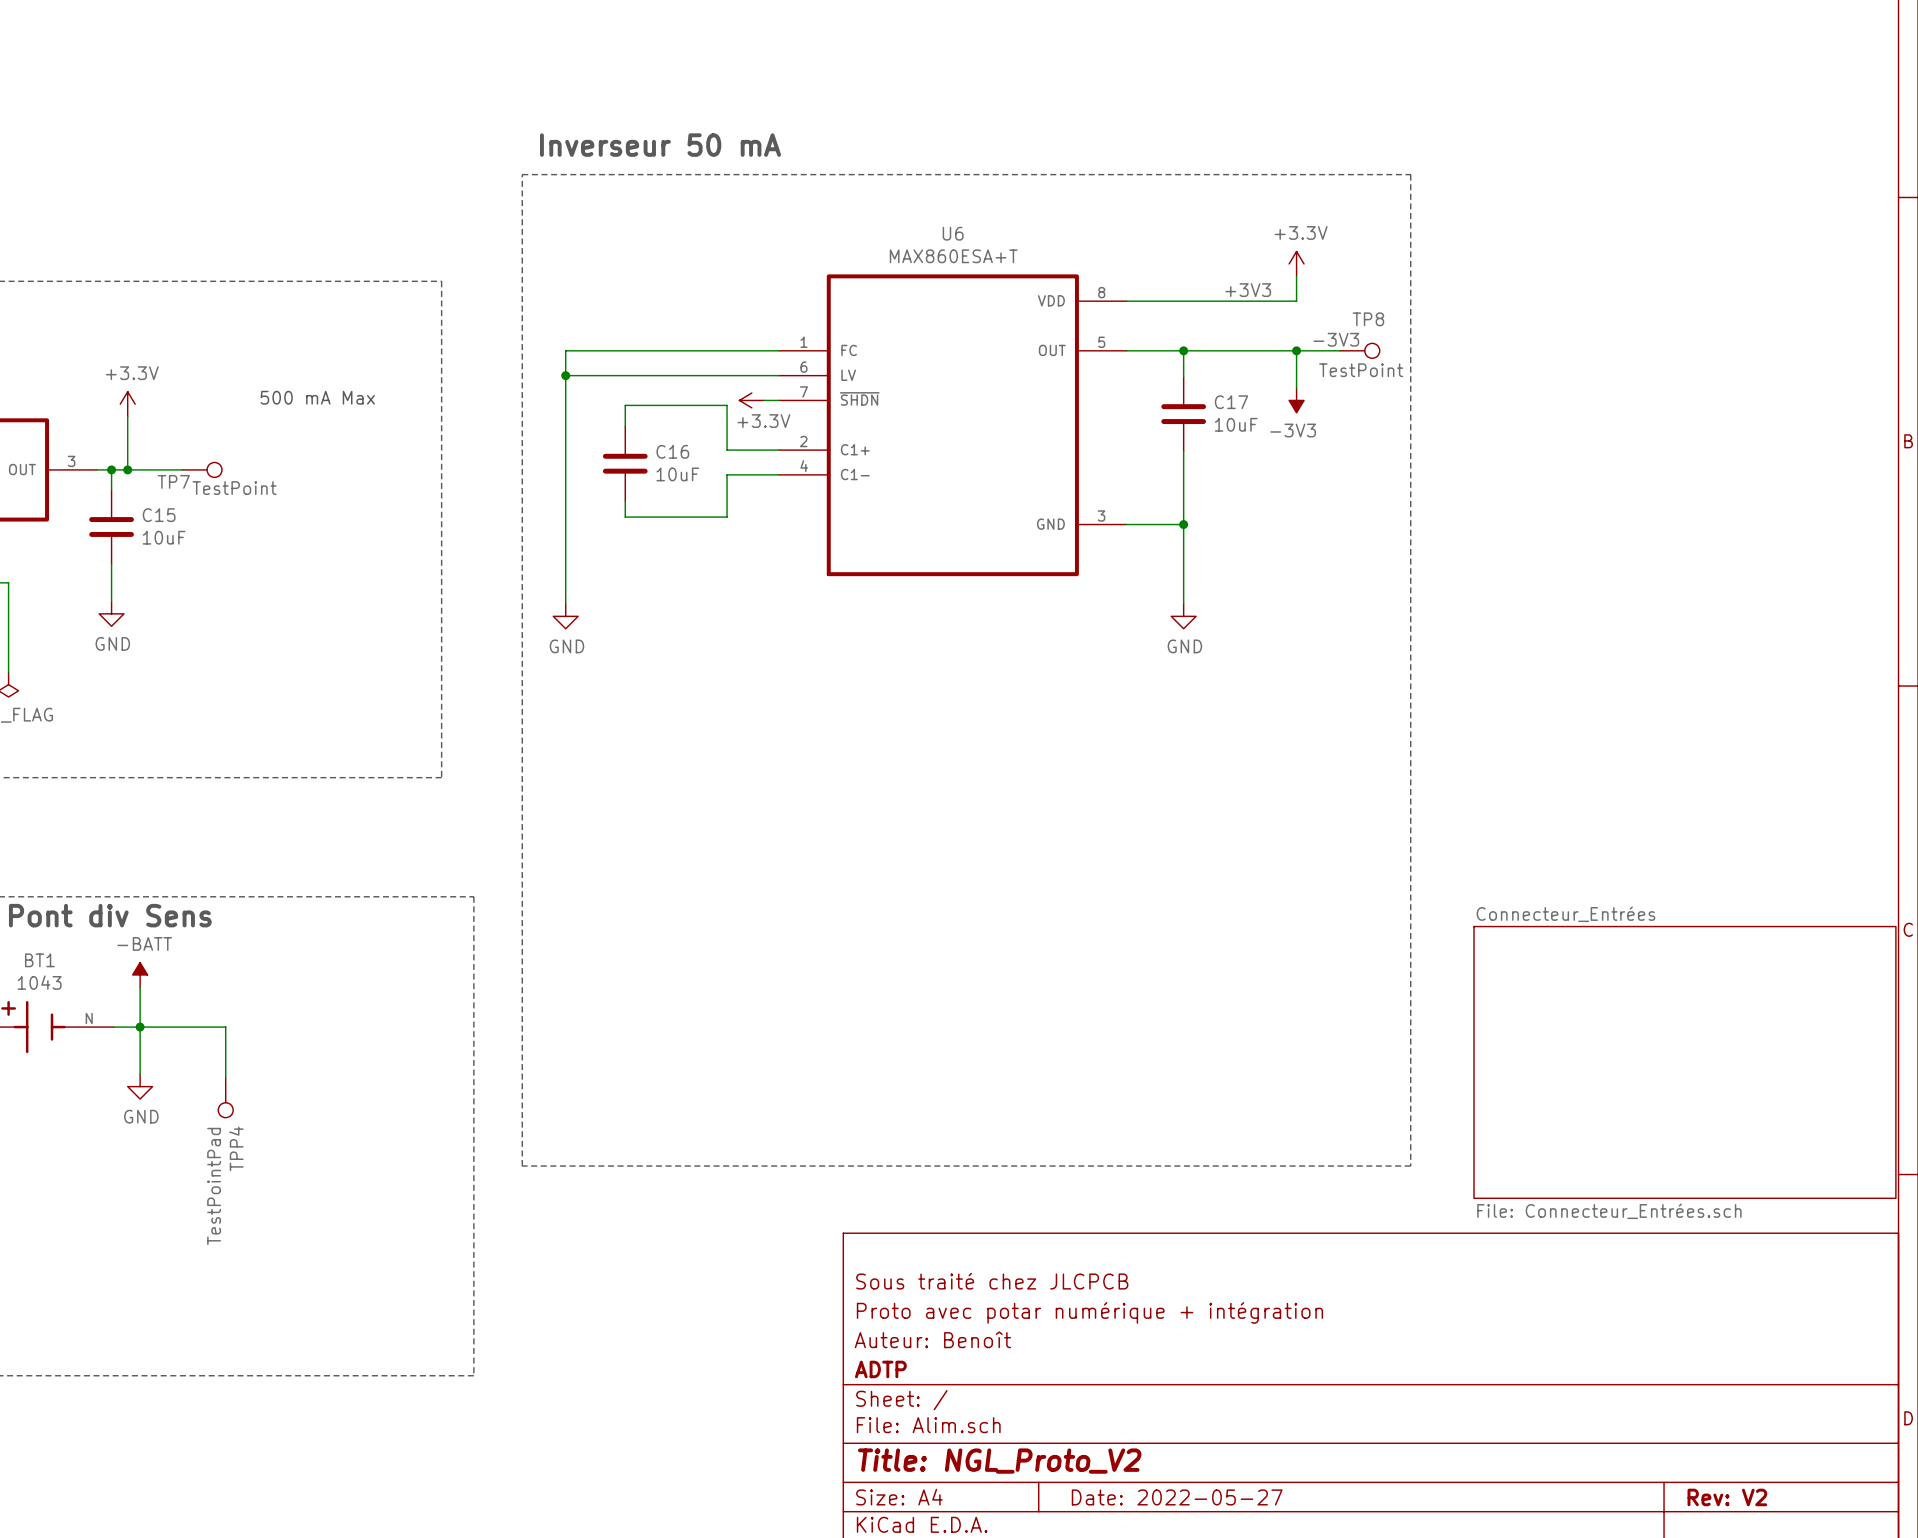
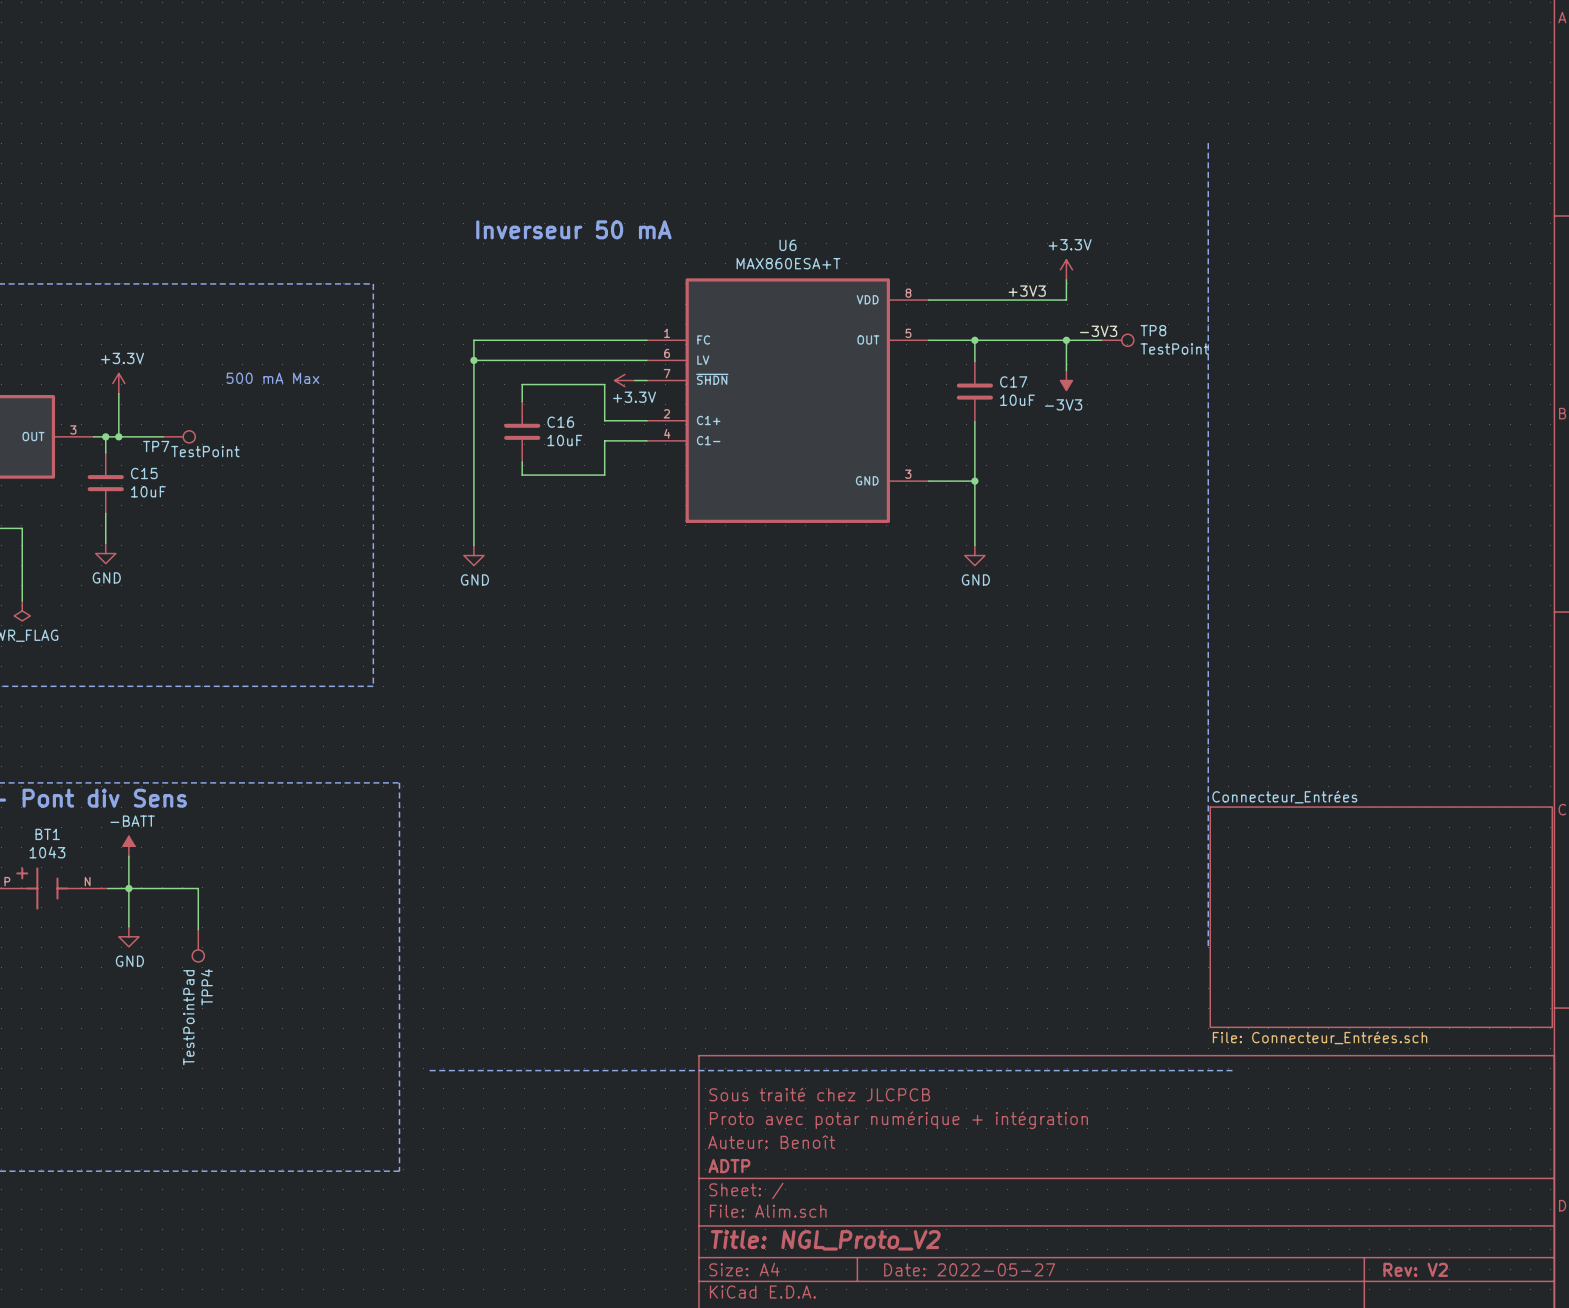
line: none -> (1208, 143) (1208, 947)
text position: Inverseur 50 mA (660, 145) -> Inverseur 50 mA (573, 229)
line: (522, 174) (522, 1166) (1410, 1166) (1410, 174) (522, 174) -> none
TP8 name position: TP8 (1368, 319) -> TP8 (1153, 330)
TP8 value position: TestPoint (1361, 370) -> TestPoint (1174, 348)
line: none -> (429, 1070) (1234, 1070)

